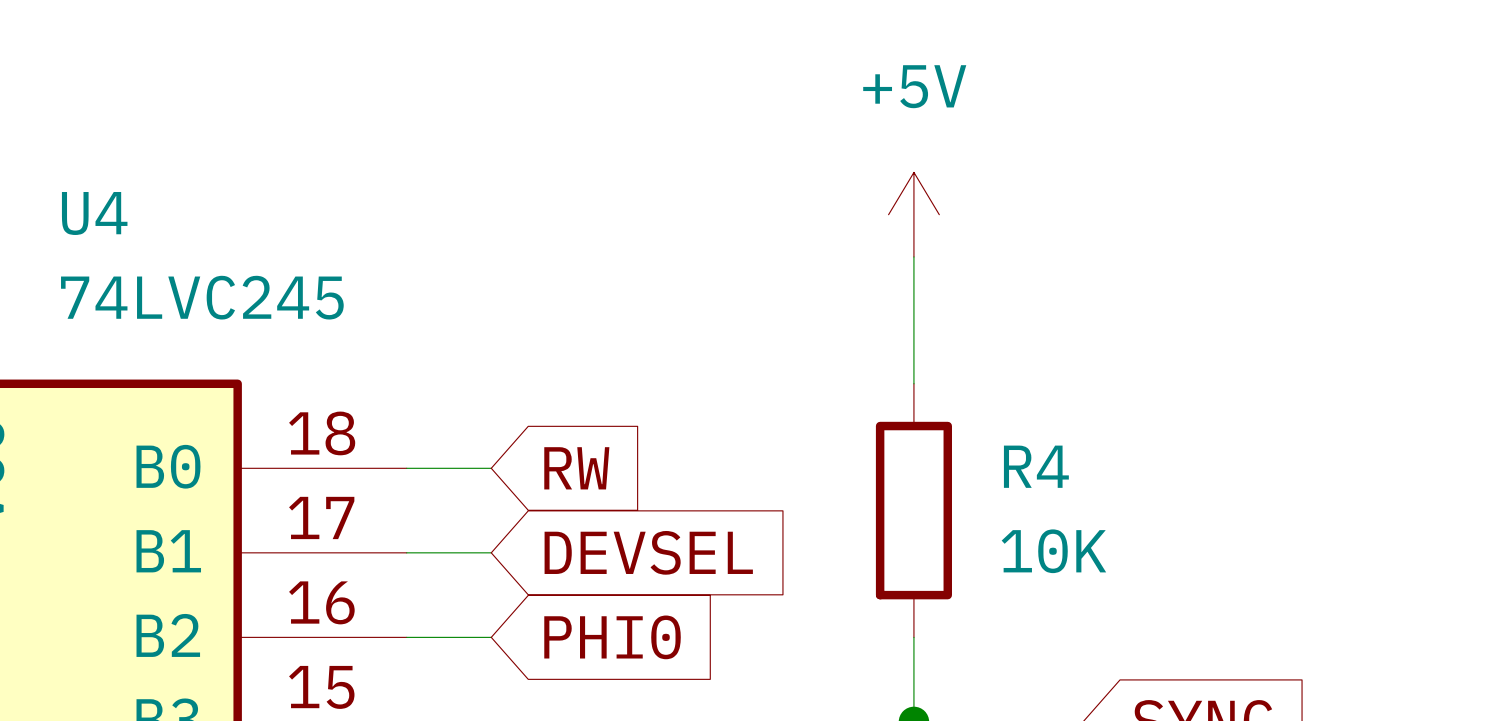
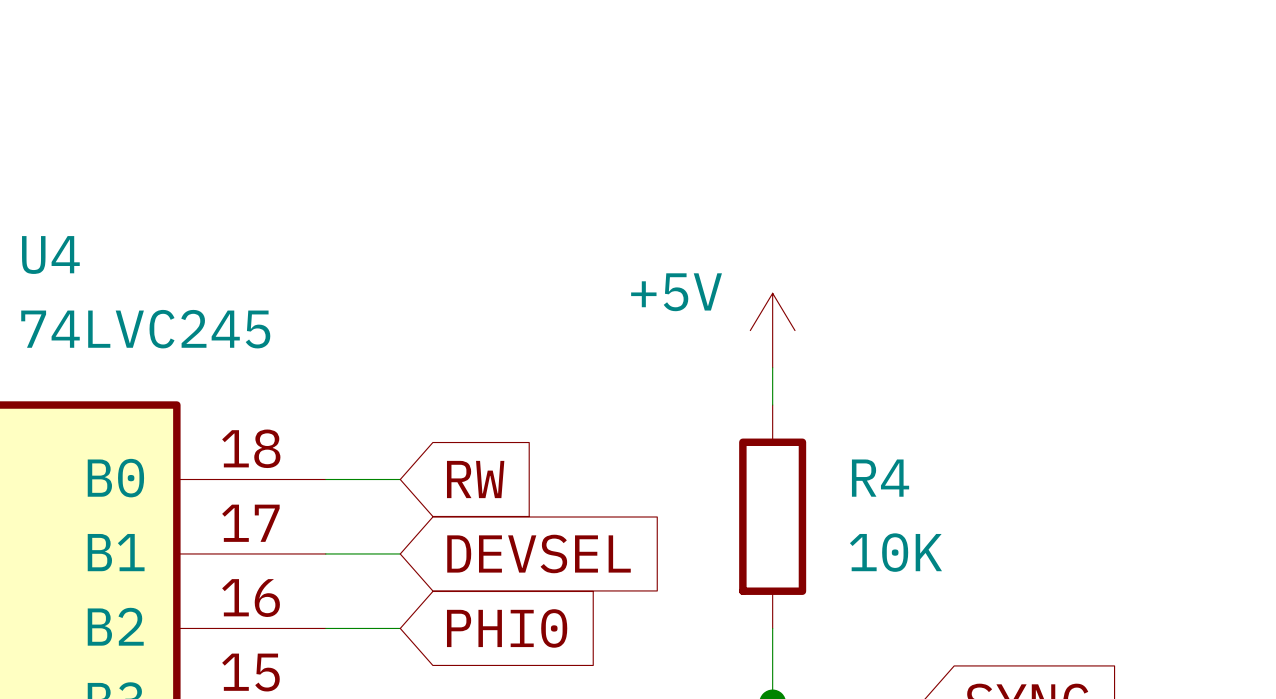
power symbol text position: +5V (914, 86) -> +5V (676, 292)
power symbol position: +5V (913, 214) -> +5V (772, 330)

